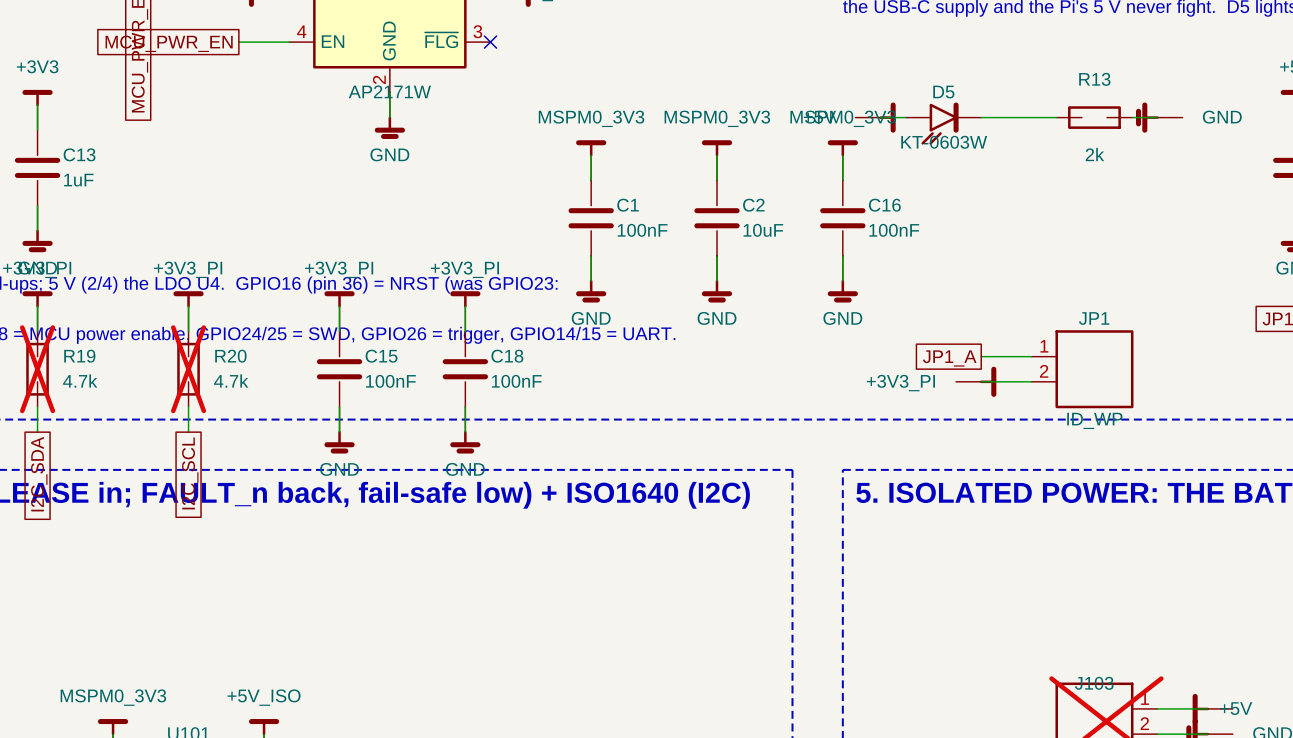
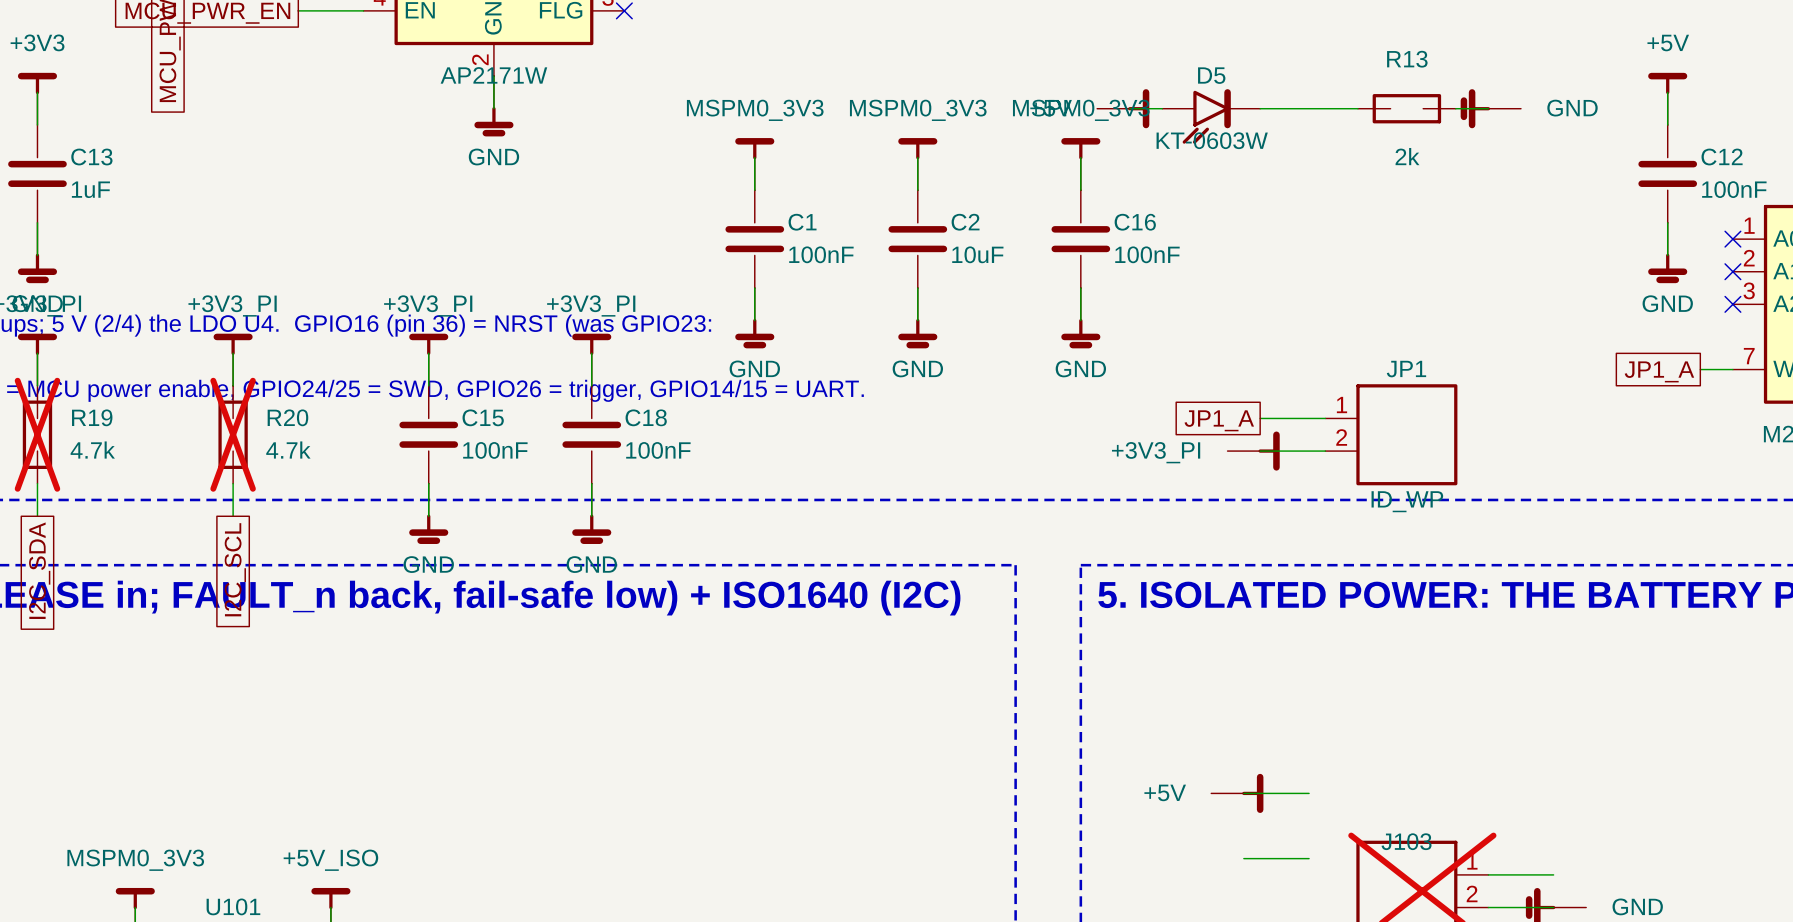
power symbol: none -> +5V (1237, 793)
wire: none -> (1243, 793) (1309, 793)
wire: none -> (1243, 858) (1309, 858)
power symbol: +5V (1212, 708) -> none

